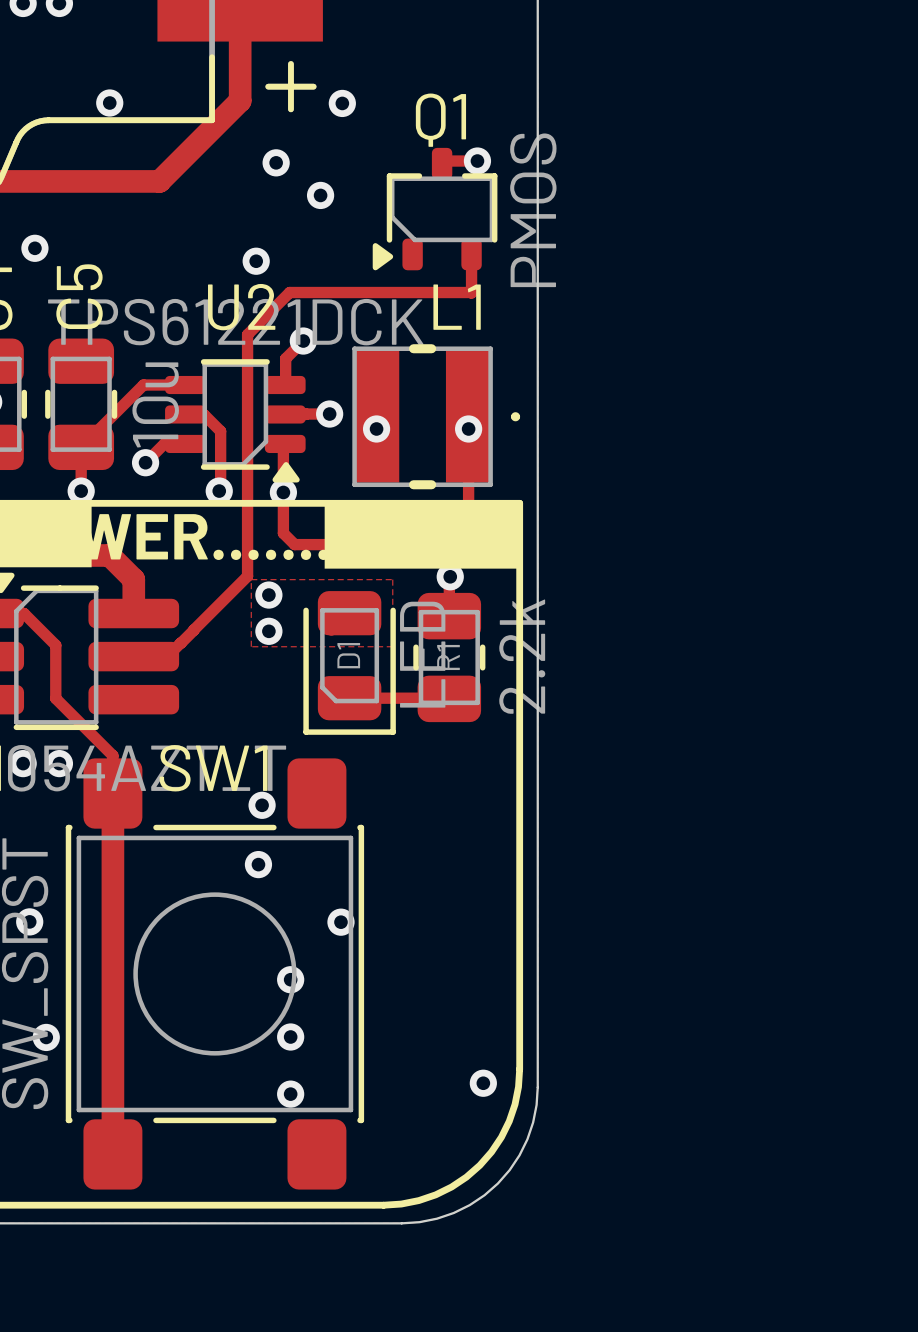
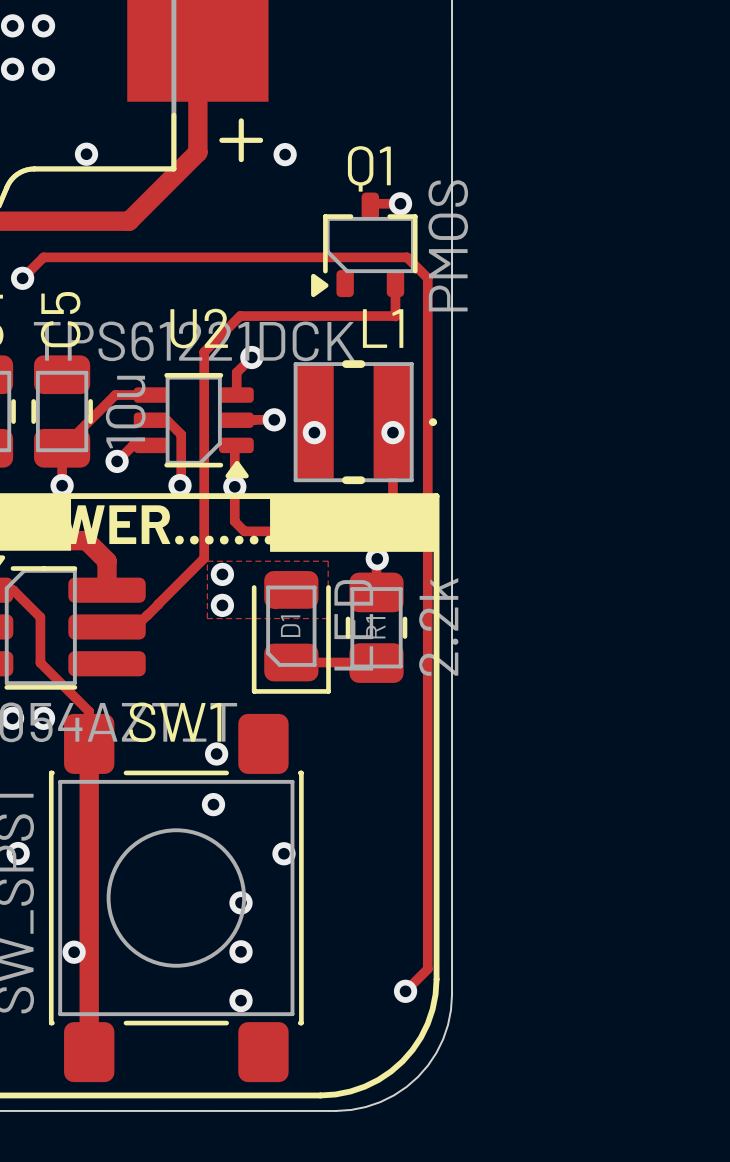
via: (276, 162) -> none
via: (320, 195) -> none
track: none -> (22, 278) (43, 257) (406, 257) (427, 278) (427, 969) (405, 991)
via: (256, 261) -> none
via position: (46, 1037) -> (74, 952)

